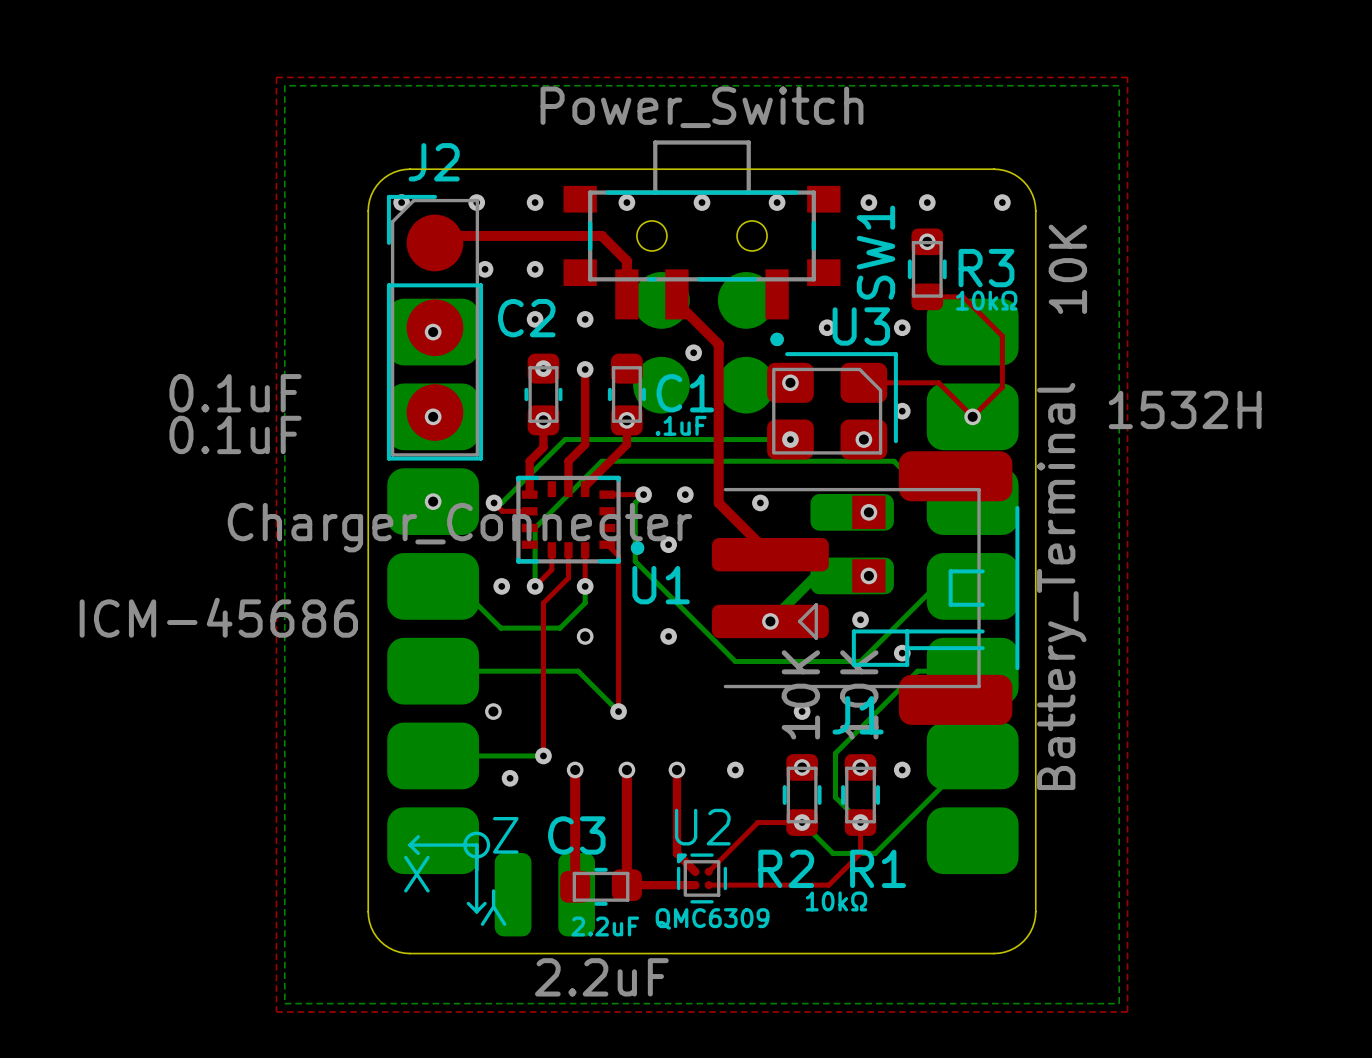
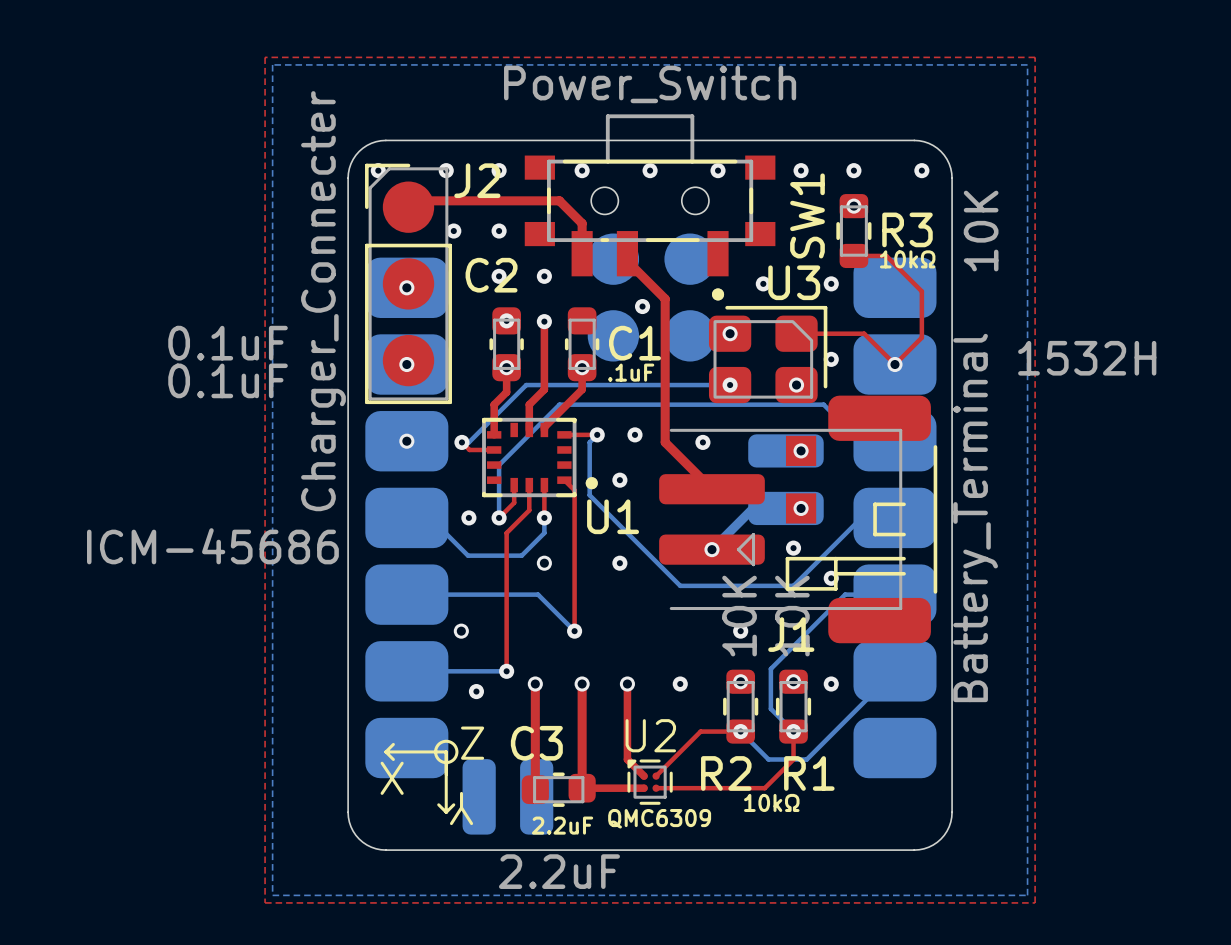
J2 name position: J2 (434, 162) -> J2 (477, 180)
J2 value rotation: 0° (459, 527) -> 90° counterclockwise (323, 301)

